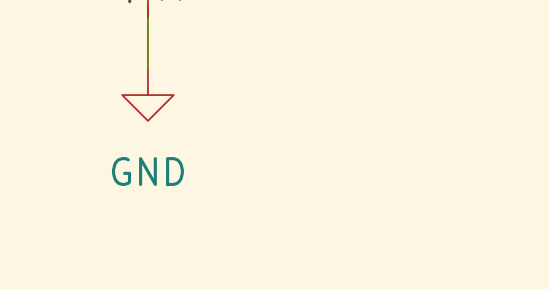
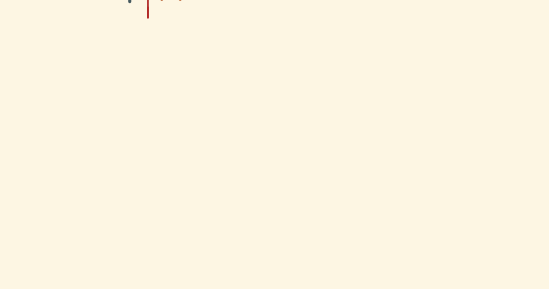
wire: (147, 17) (147, 69) -> none
power symbol: GND (147, 95) -> none

